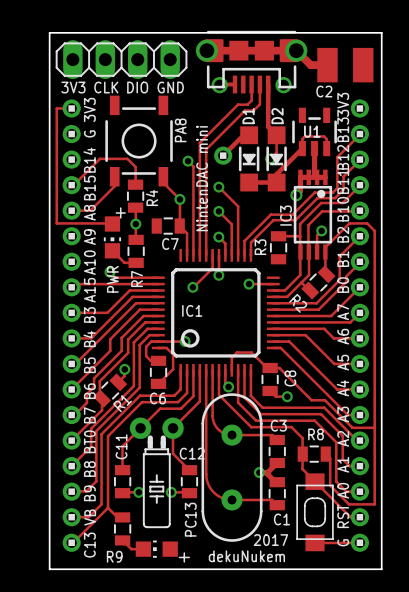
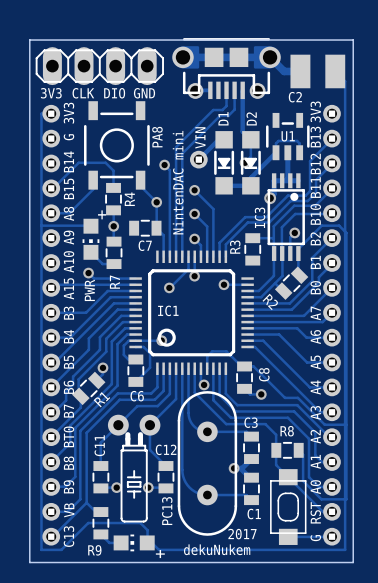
track: (61, 108) (56, 108) (56, 223) (61, 223) -> (41, 113) (41, 549) (61, 549) (88, 523) (140, 523) (147, 530) (147, 538) (158, 549) (345, 549) (345, 81) (335, 71)
text: none -> VIN (200, 137)
text position: PWR (112, 279) -> PWR (89, 290)

